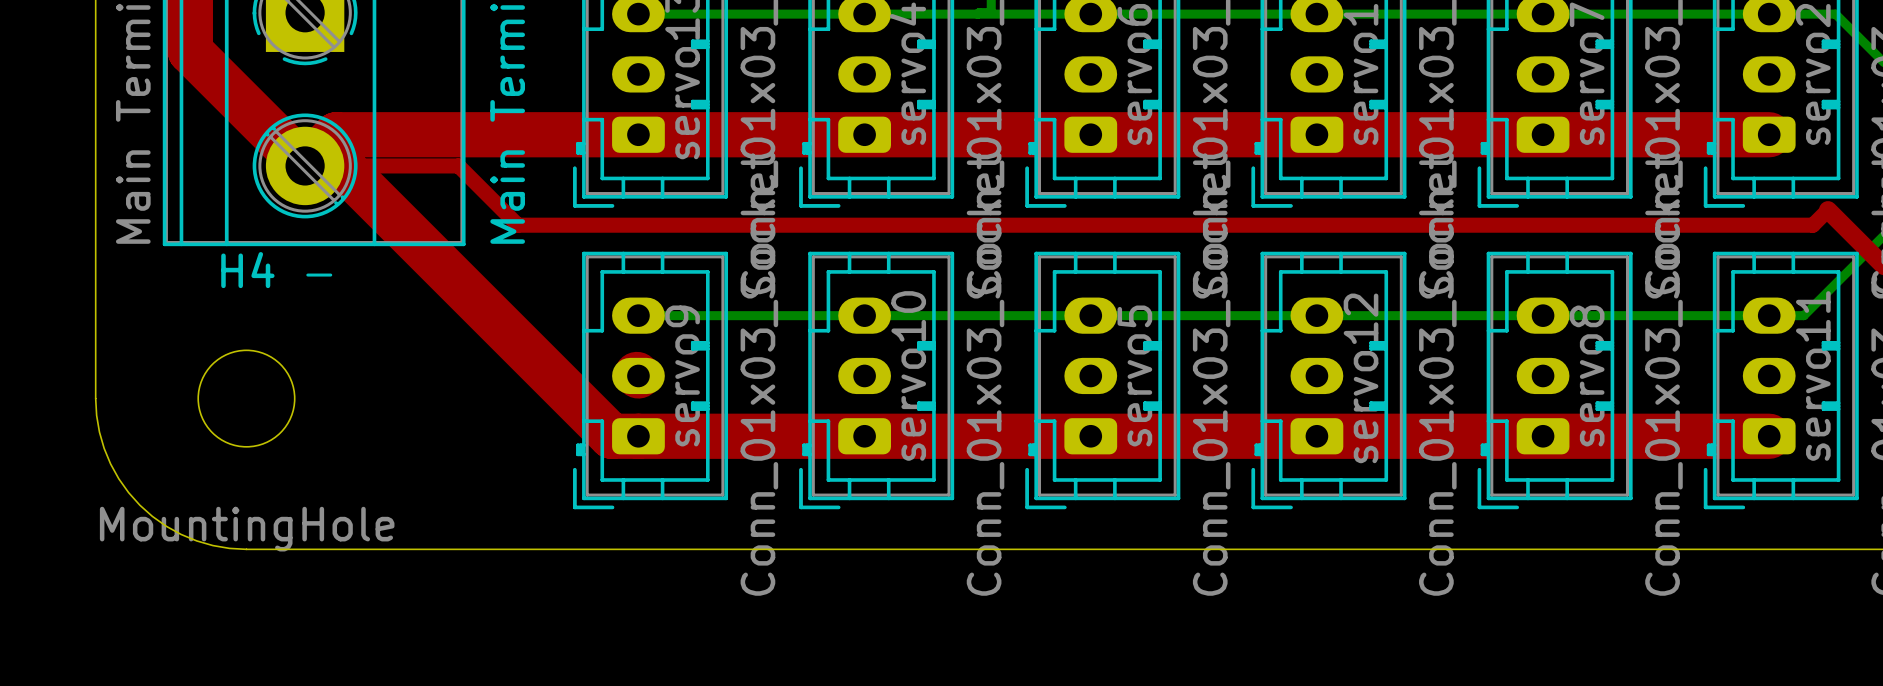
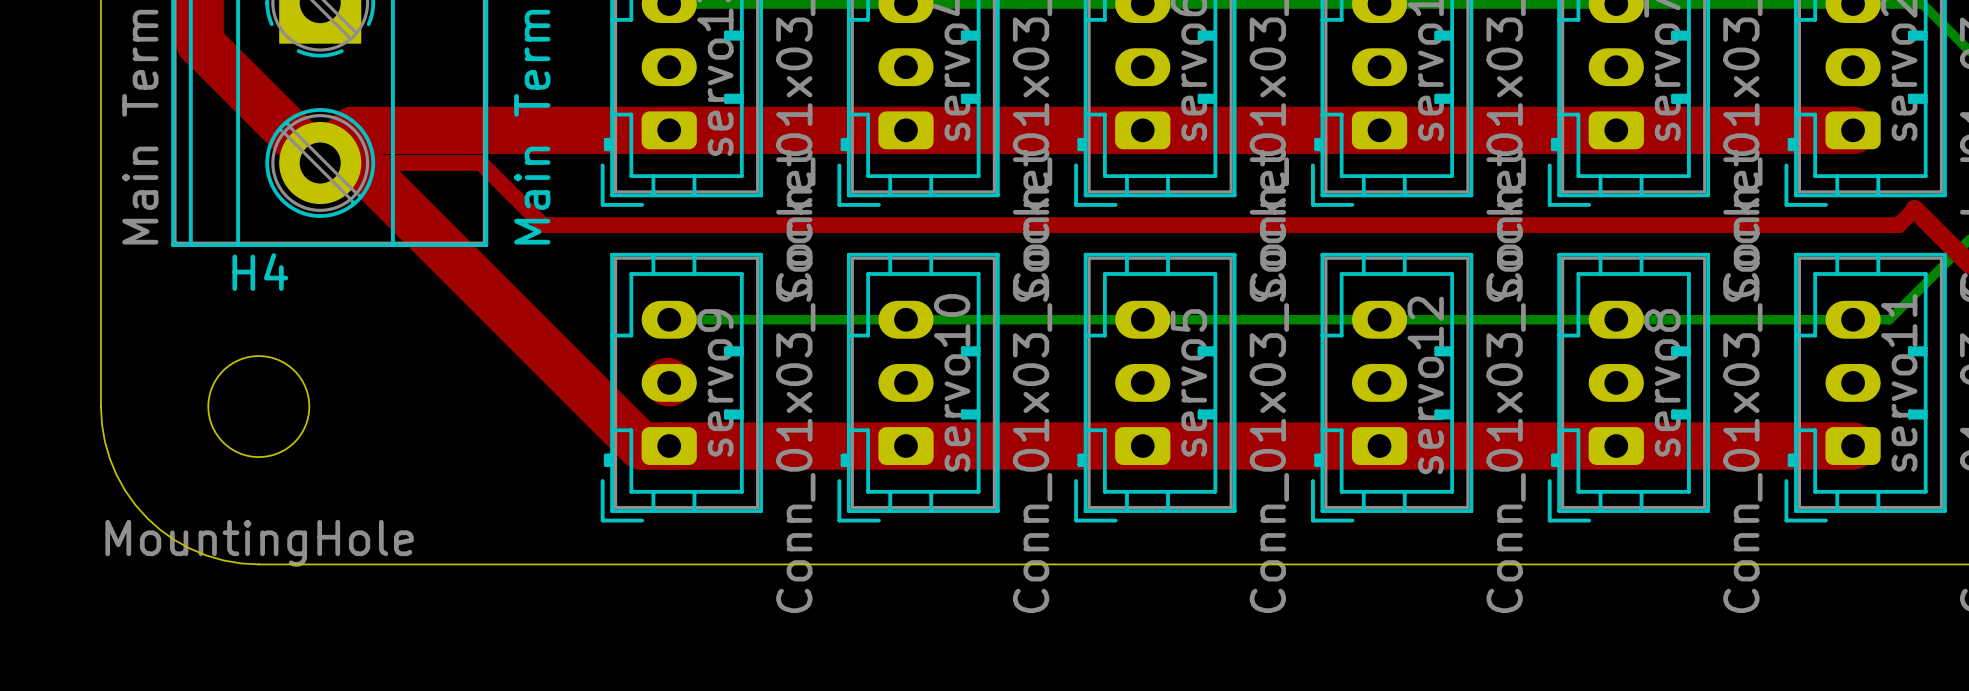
text: - (319, 275) -> none

